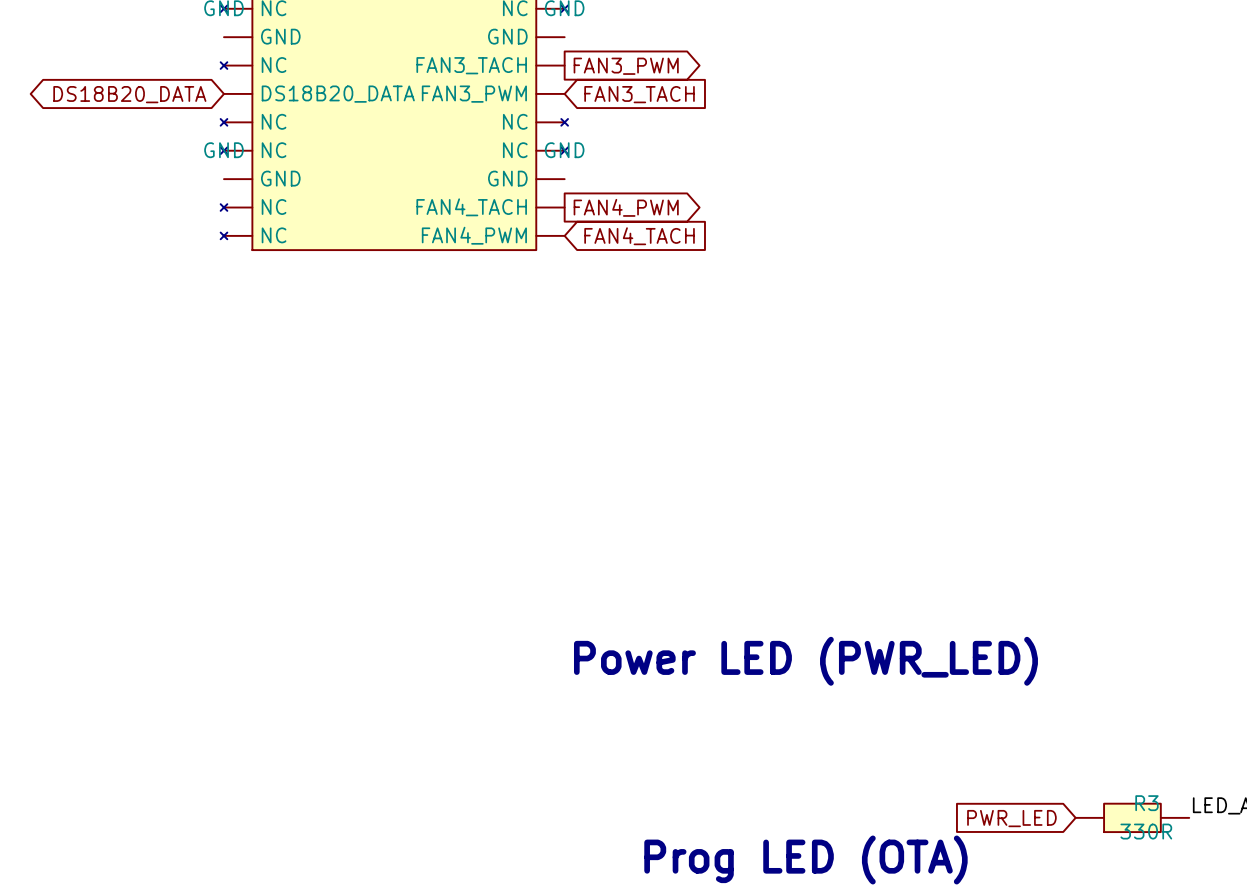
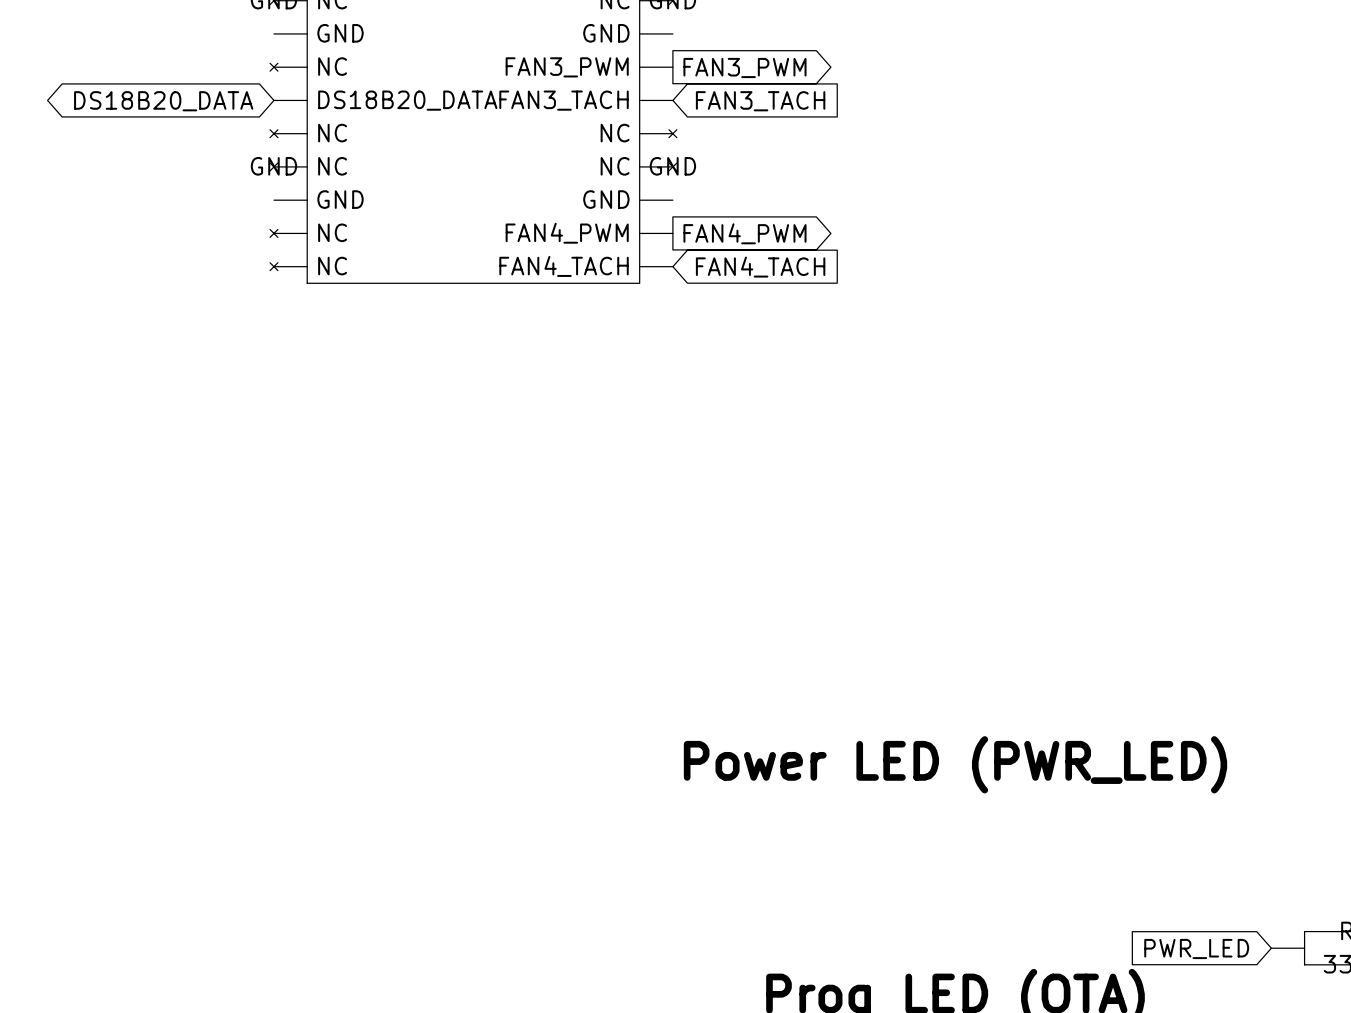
part pin name: FAN3_TACH (471, 65) -> FAN3_PWM (567, 67)
part pin name: FAN3_PWM (474, 94) -> FAN3_TACH (564, 100)
part pin name: FAN4_TACH (471, 207) -> FAN4_PWM (567, 233)
part pin name: FAN4_PWM (474, 235) -> FAN4_TACH (564, 266)

